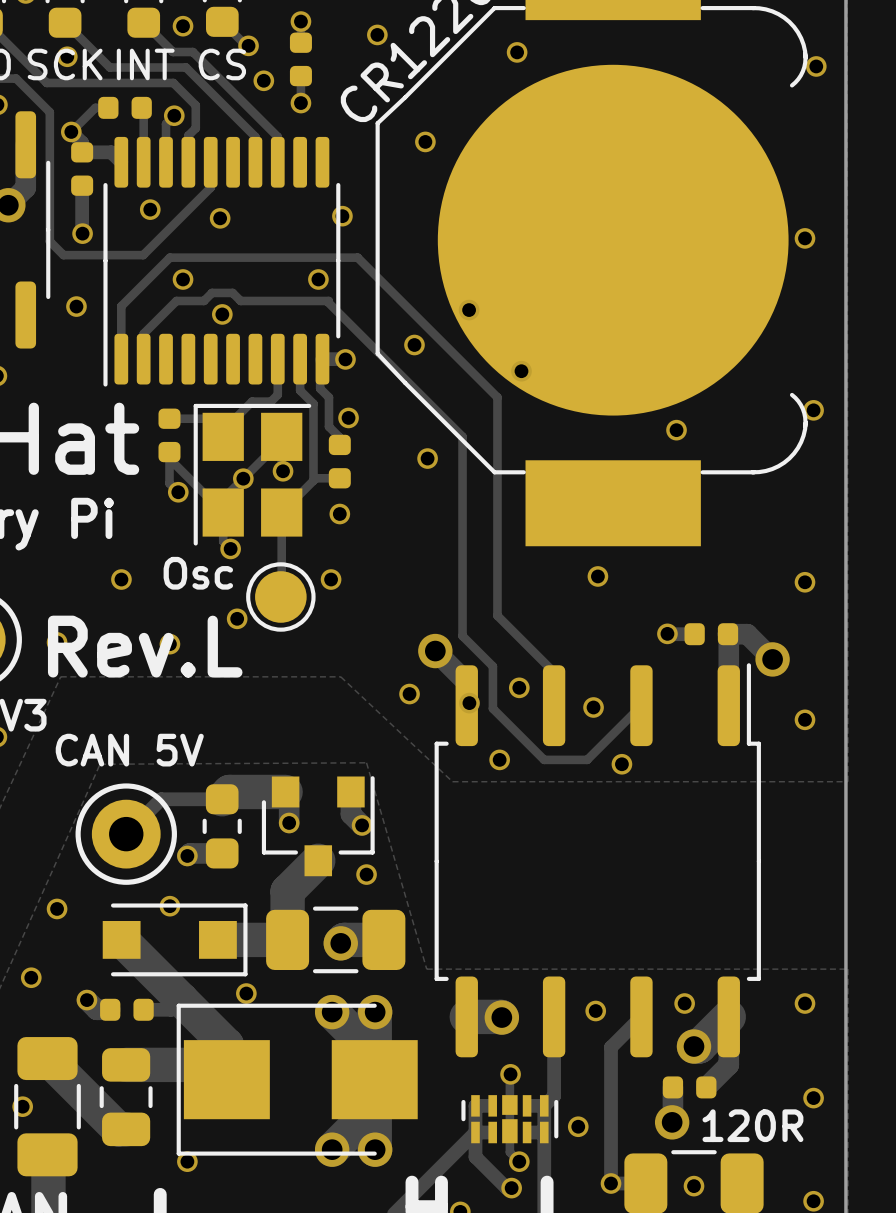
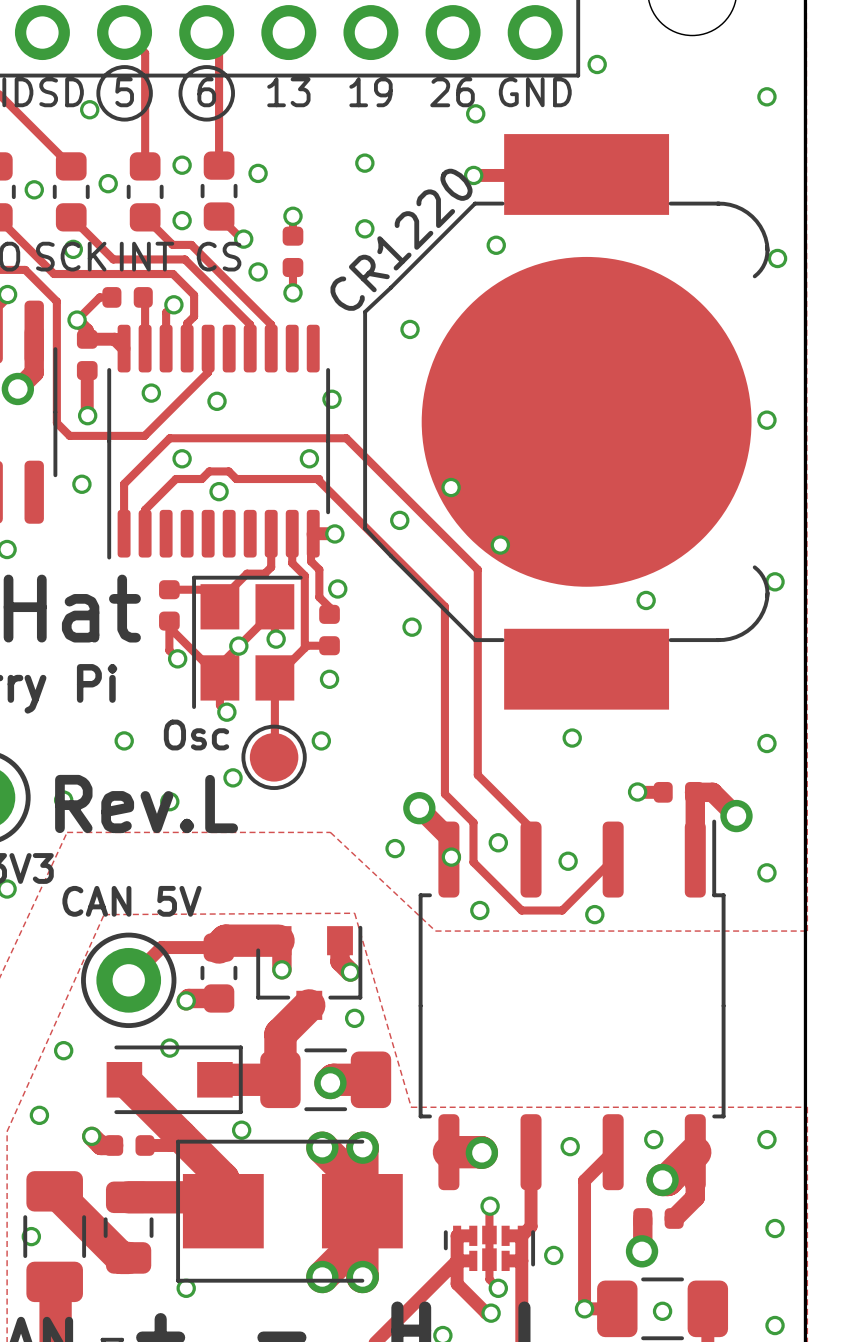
text: 120R (752, 1125) -> none

